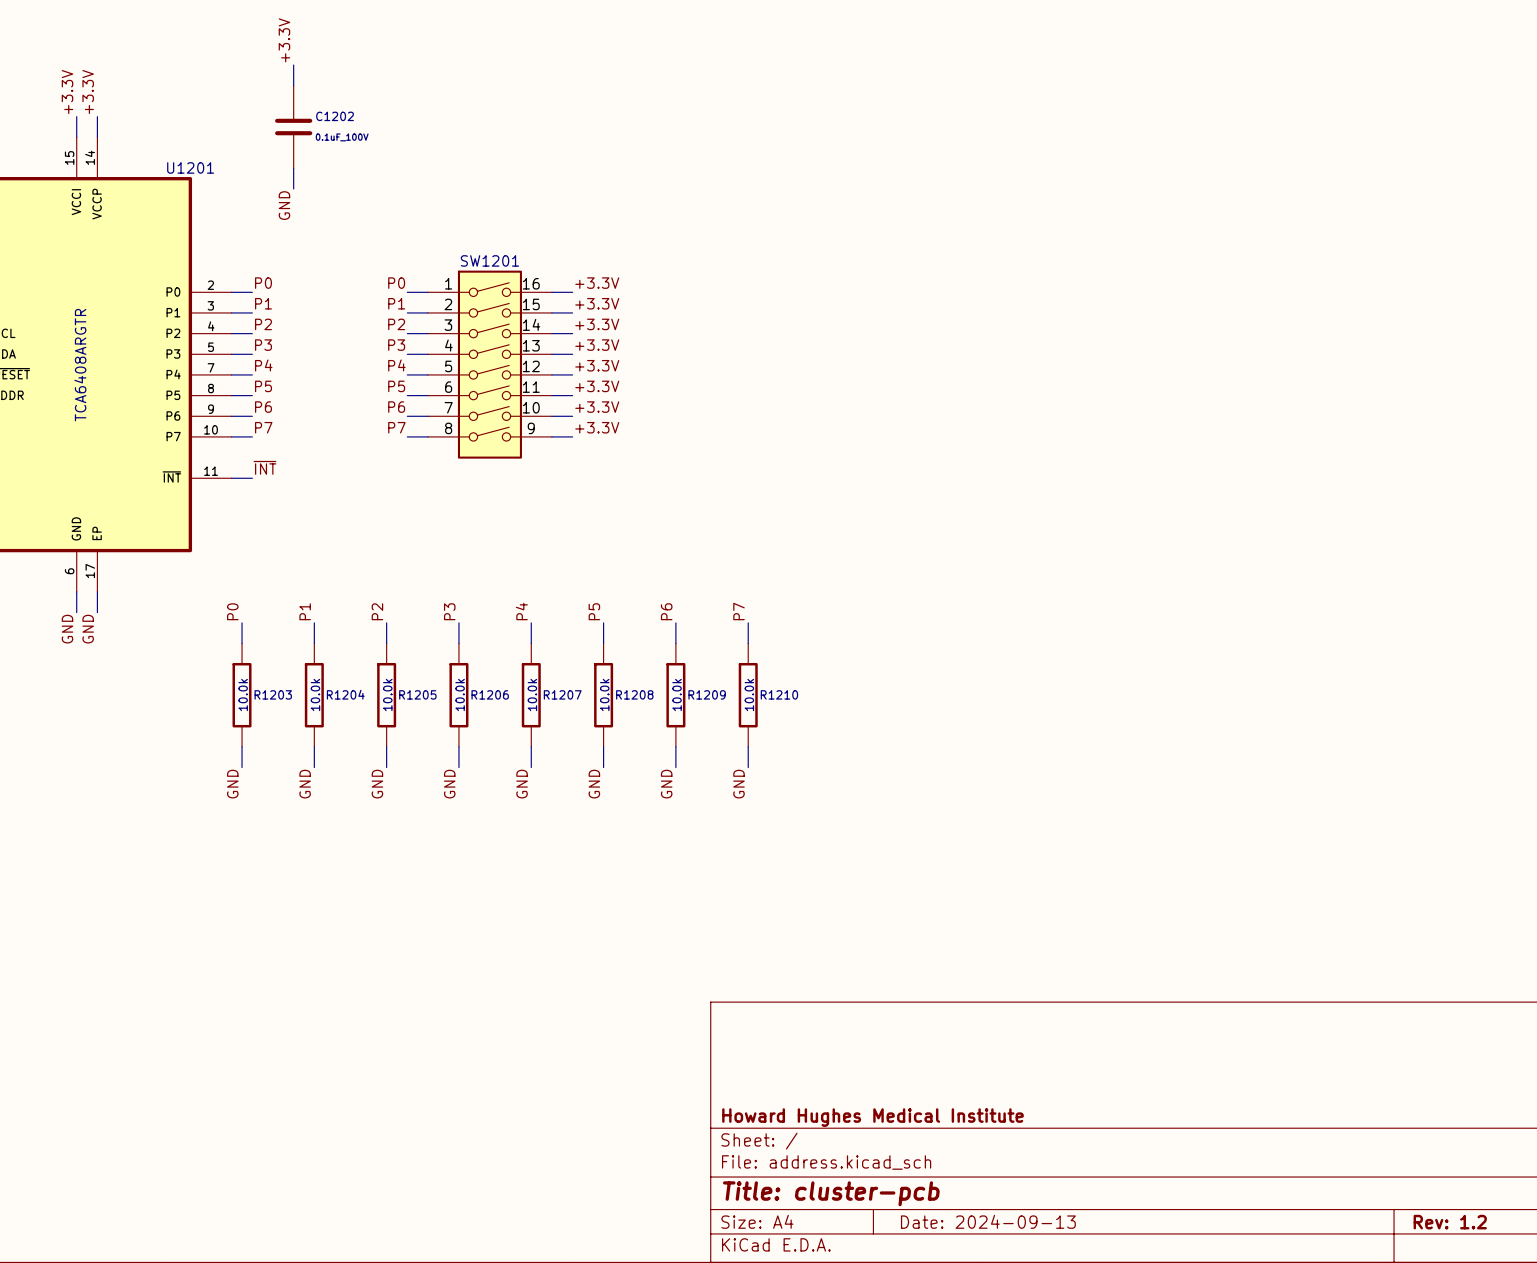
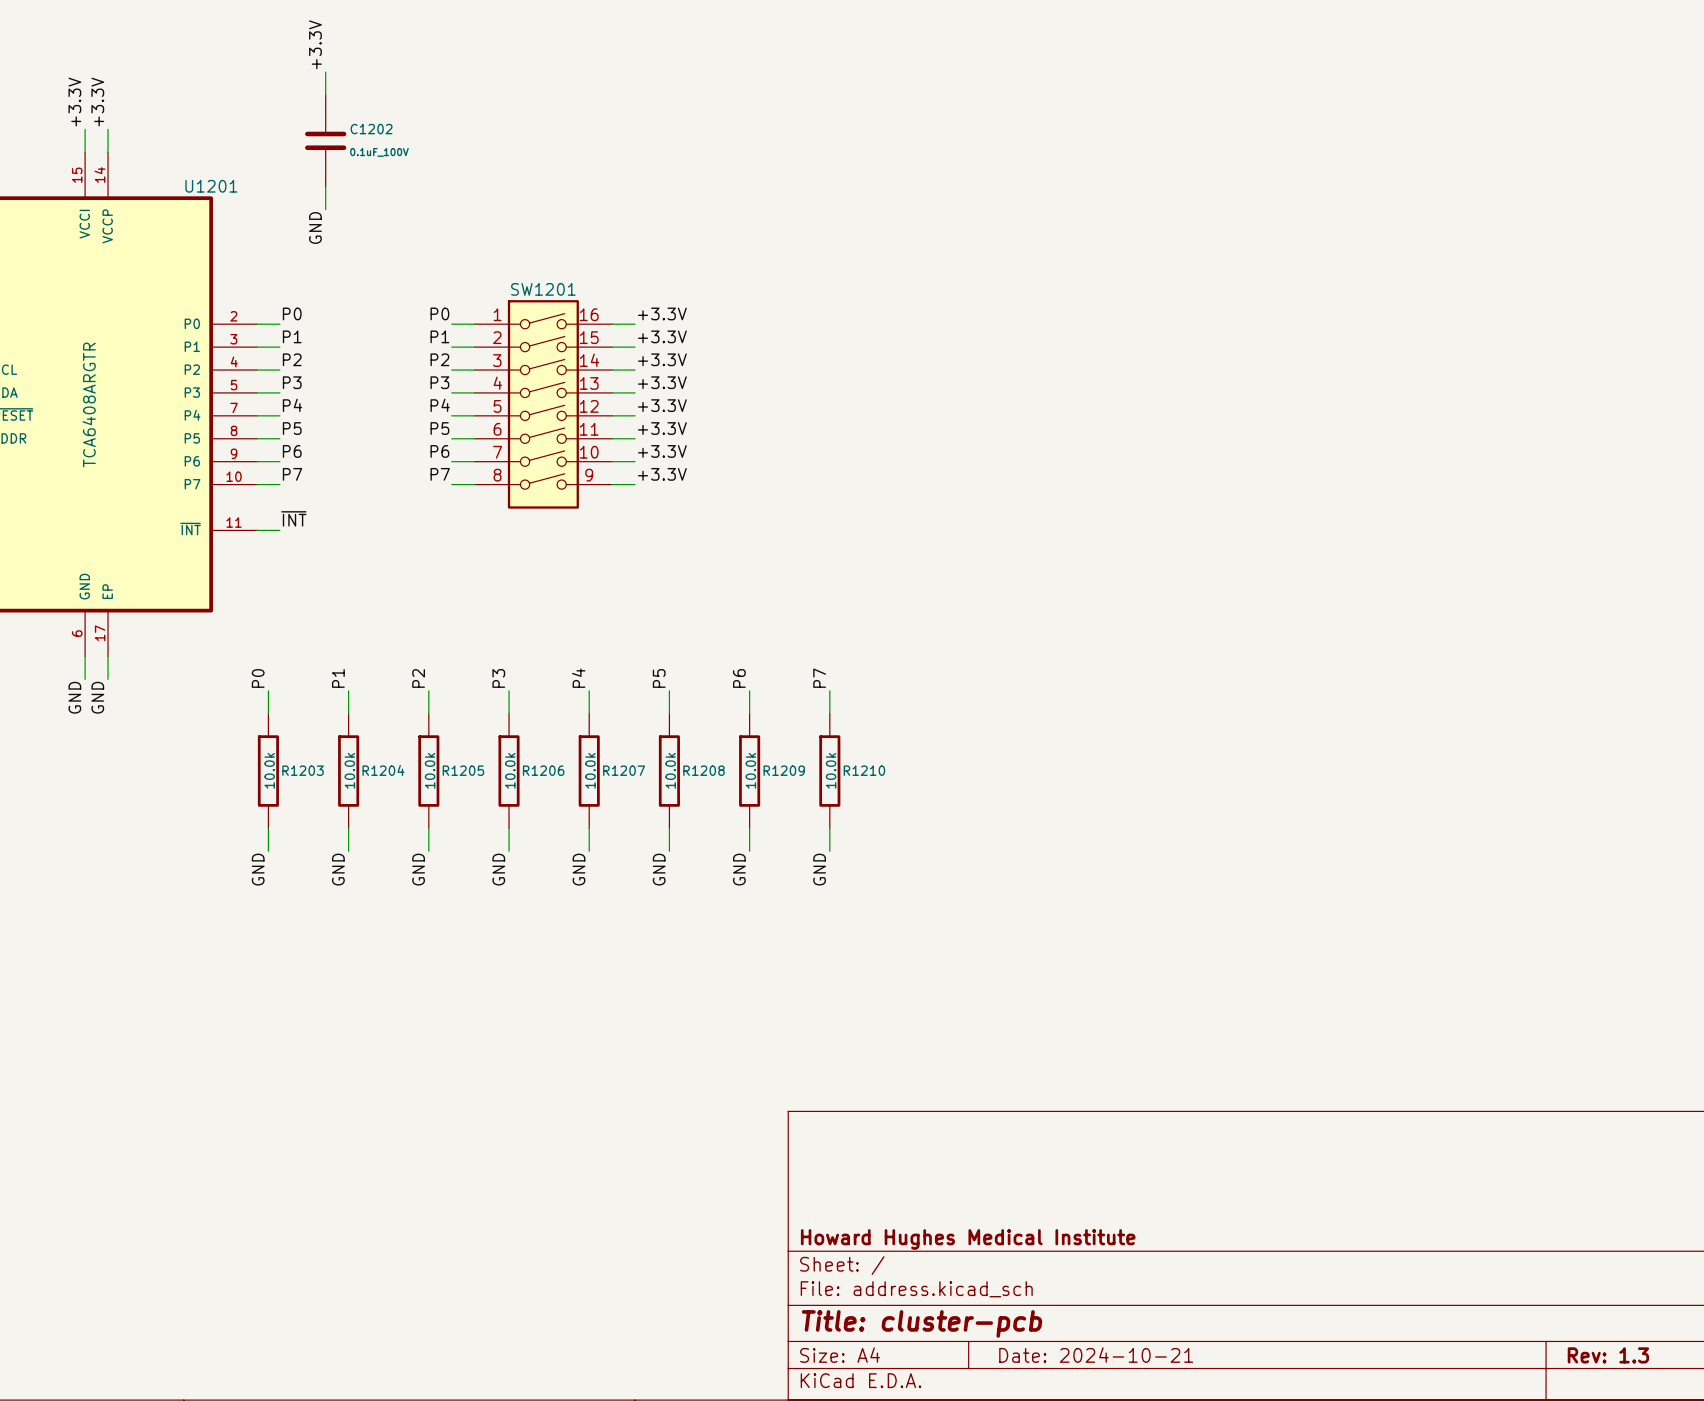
title block: Date: 2024-09-13 (988, 1221) -> Date: 2024-10-21 (1096, 1355)
title block: Rev: 1.2 (1450, 1222) -> Rev: 1.3 (1608, 1355)

